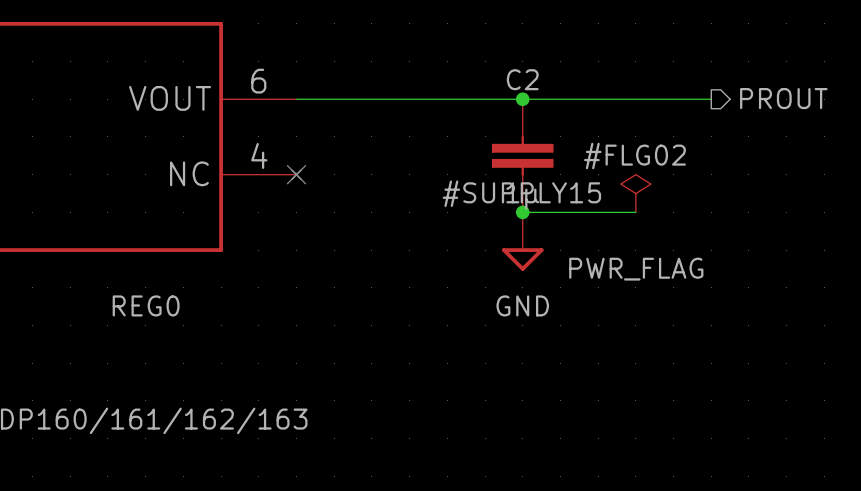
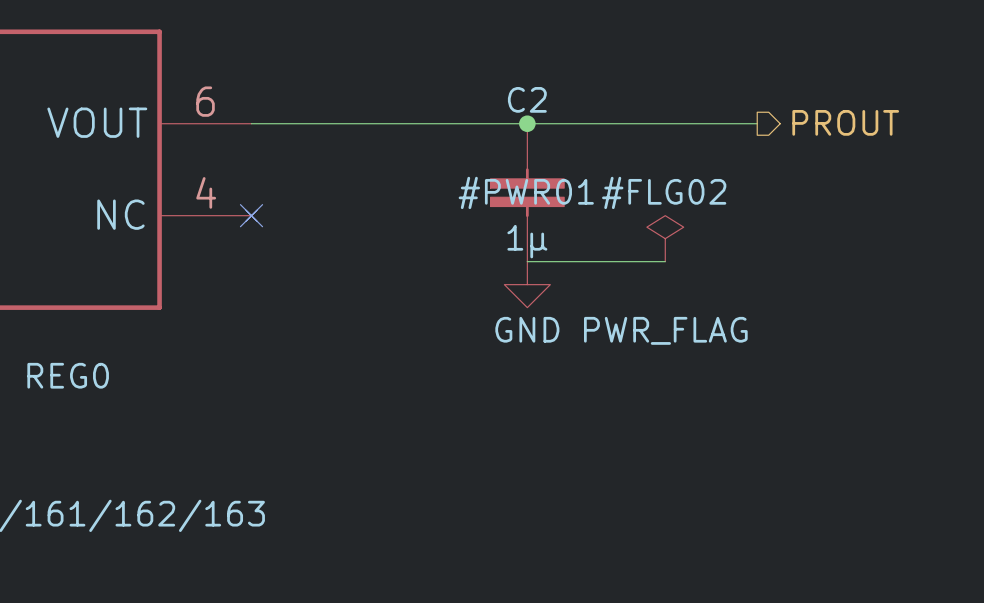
#SUPPLY15 name: #SUPPLY15 (521, 193) -> #PWR01 (526, 192)
#SUPPLY15 shape: [502, 212, 544, 271] -> [504, 261, 551, 308]
junction: (522, 212) -> none

